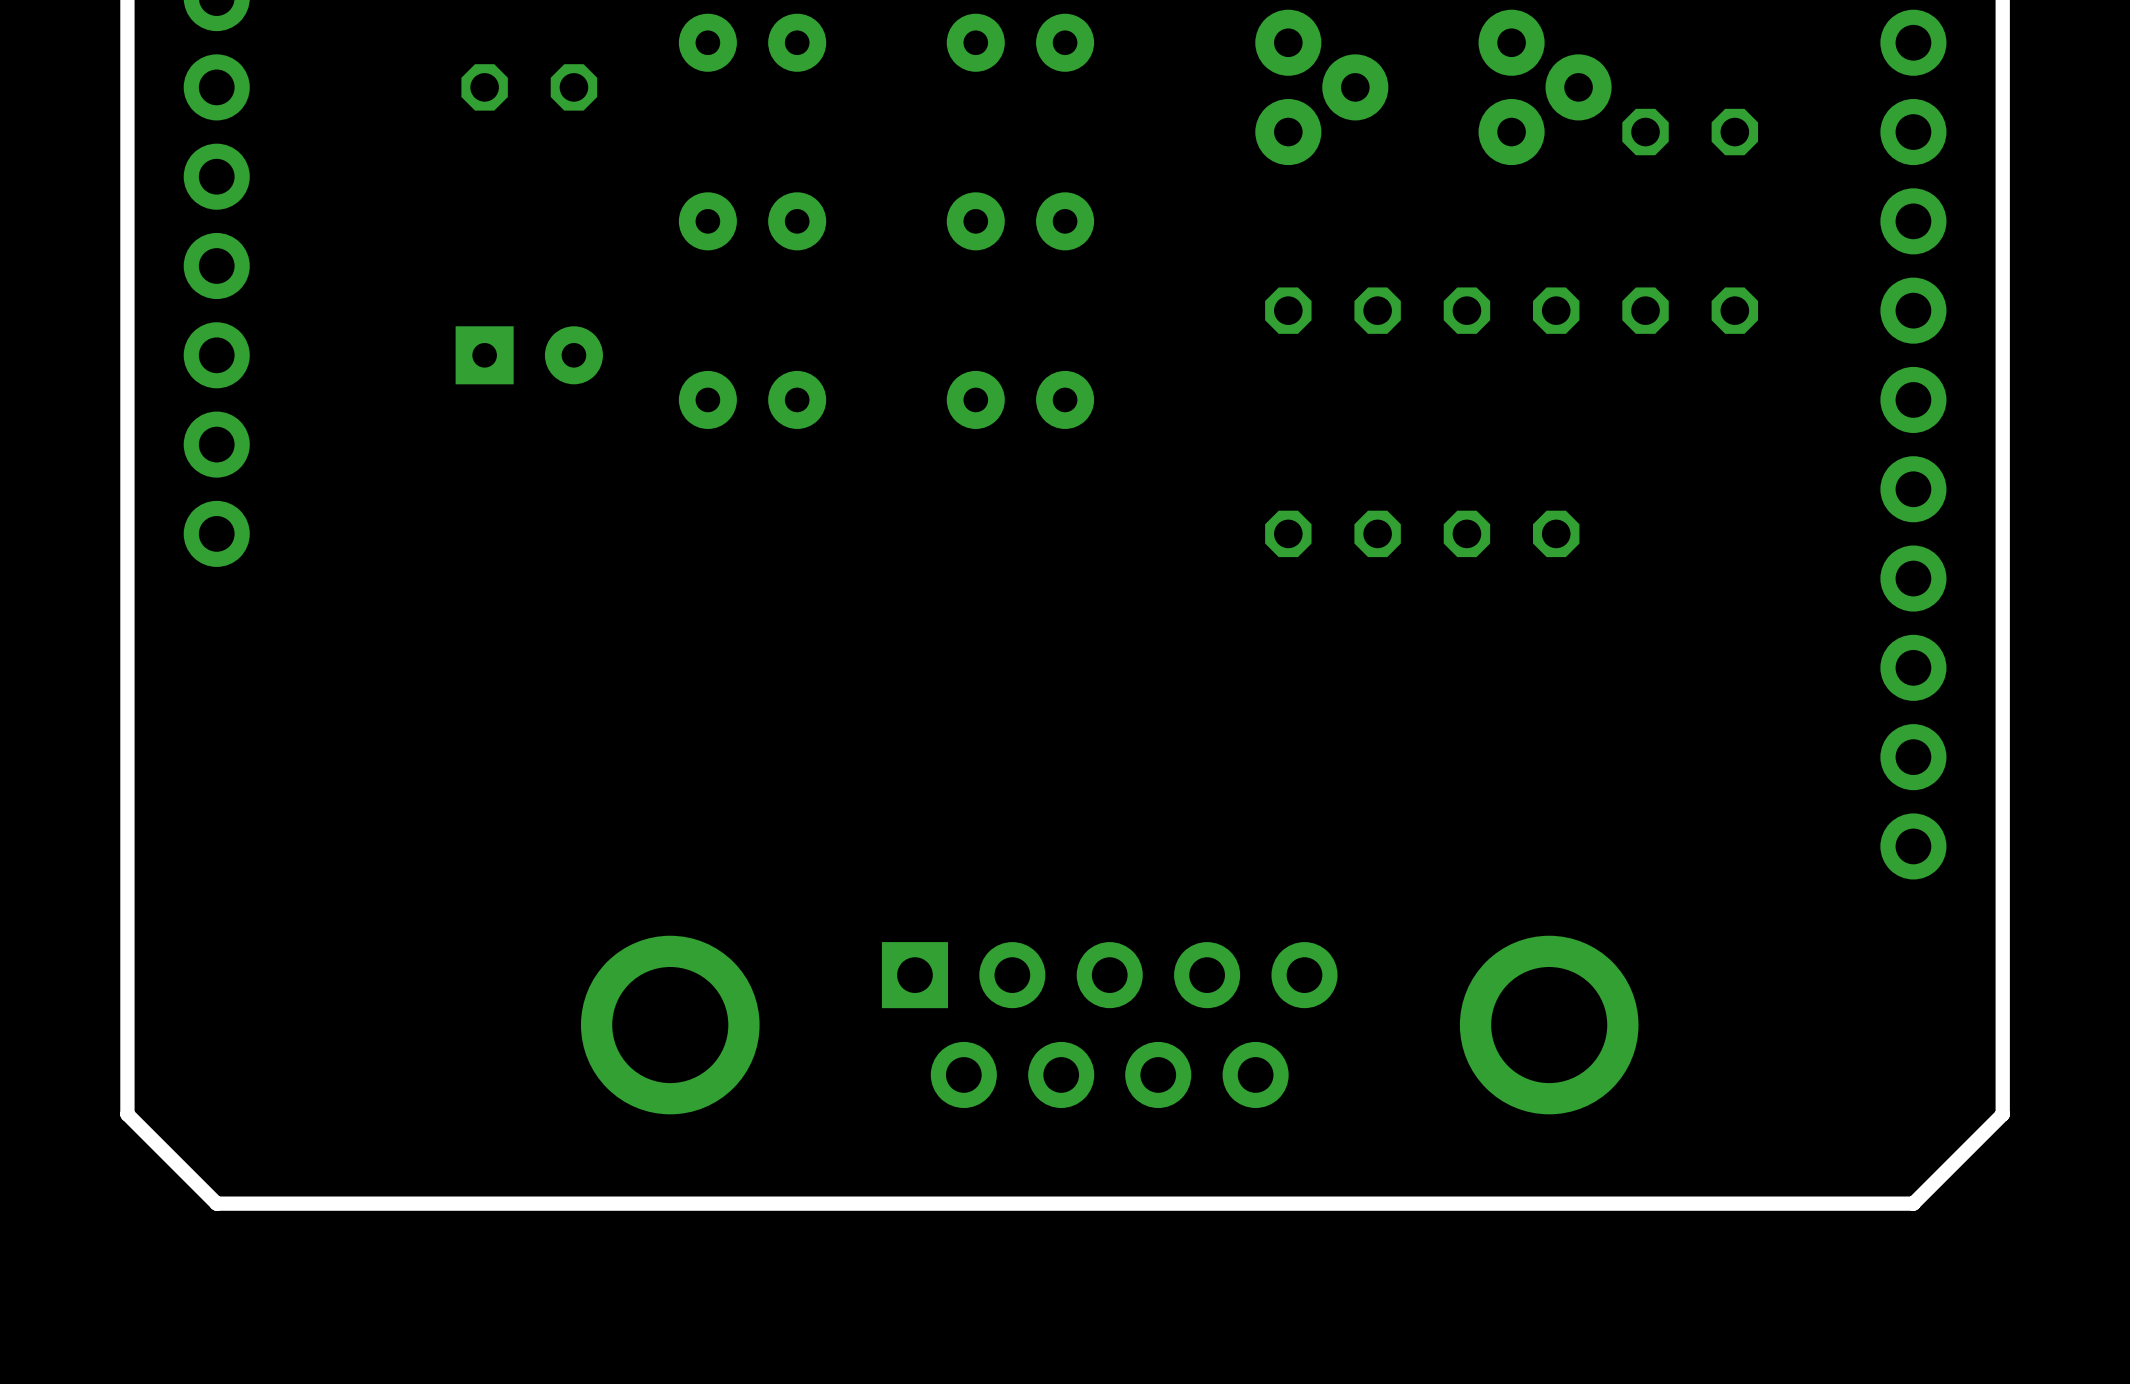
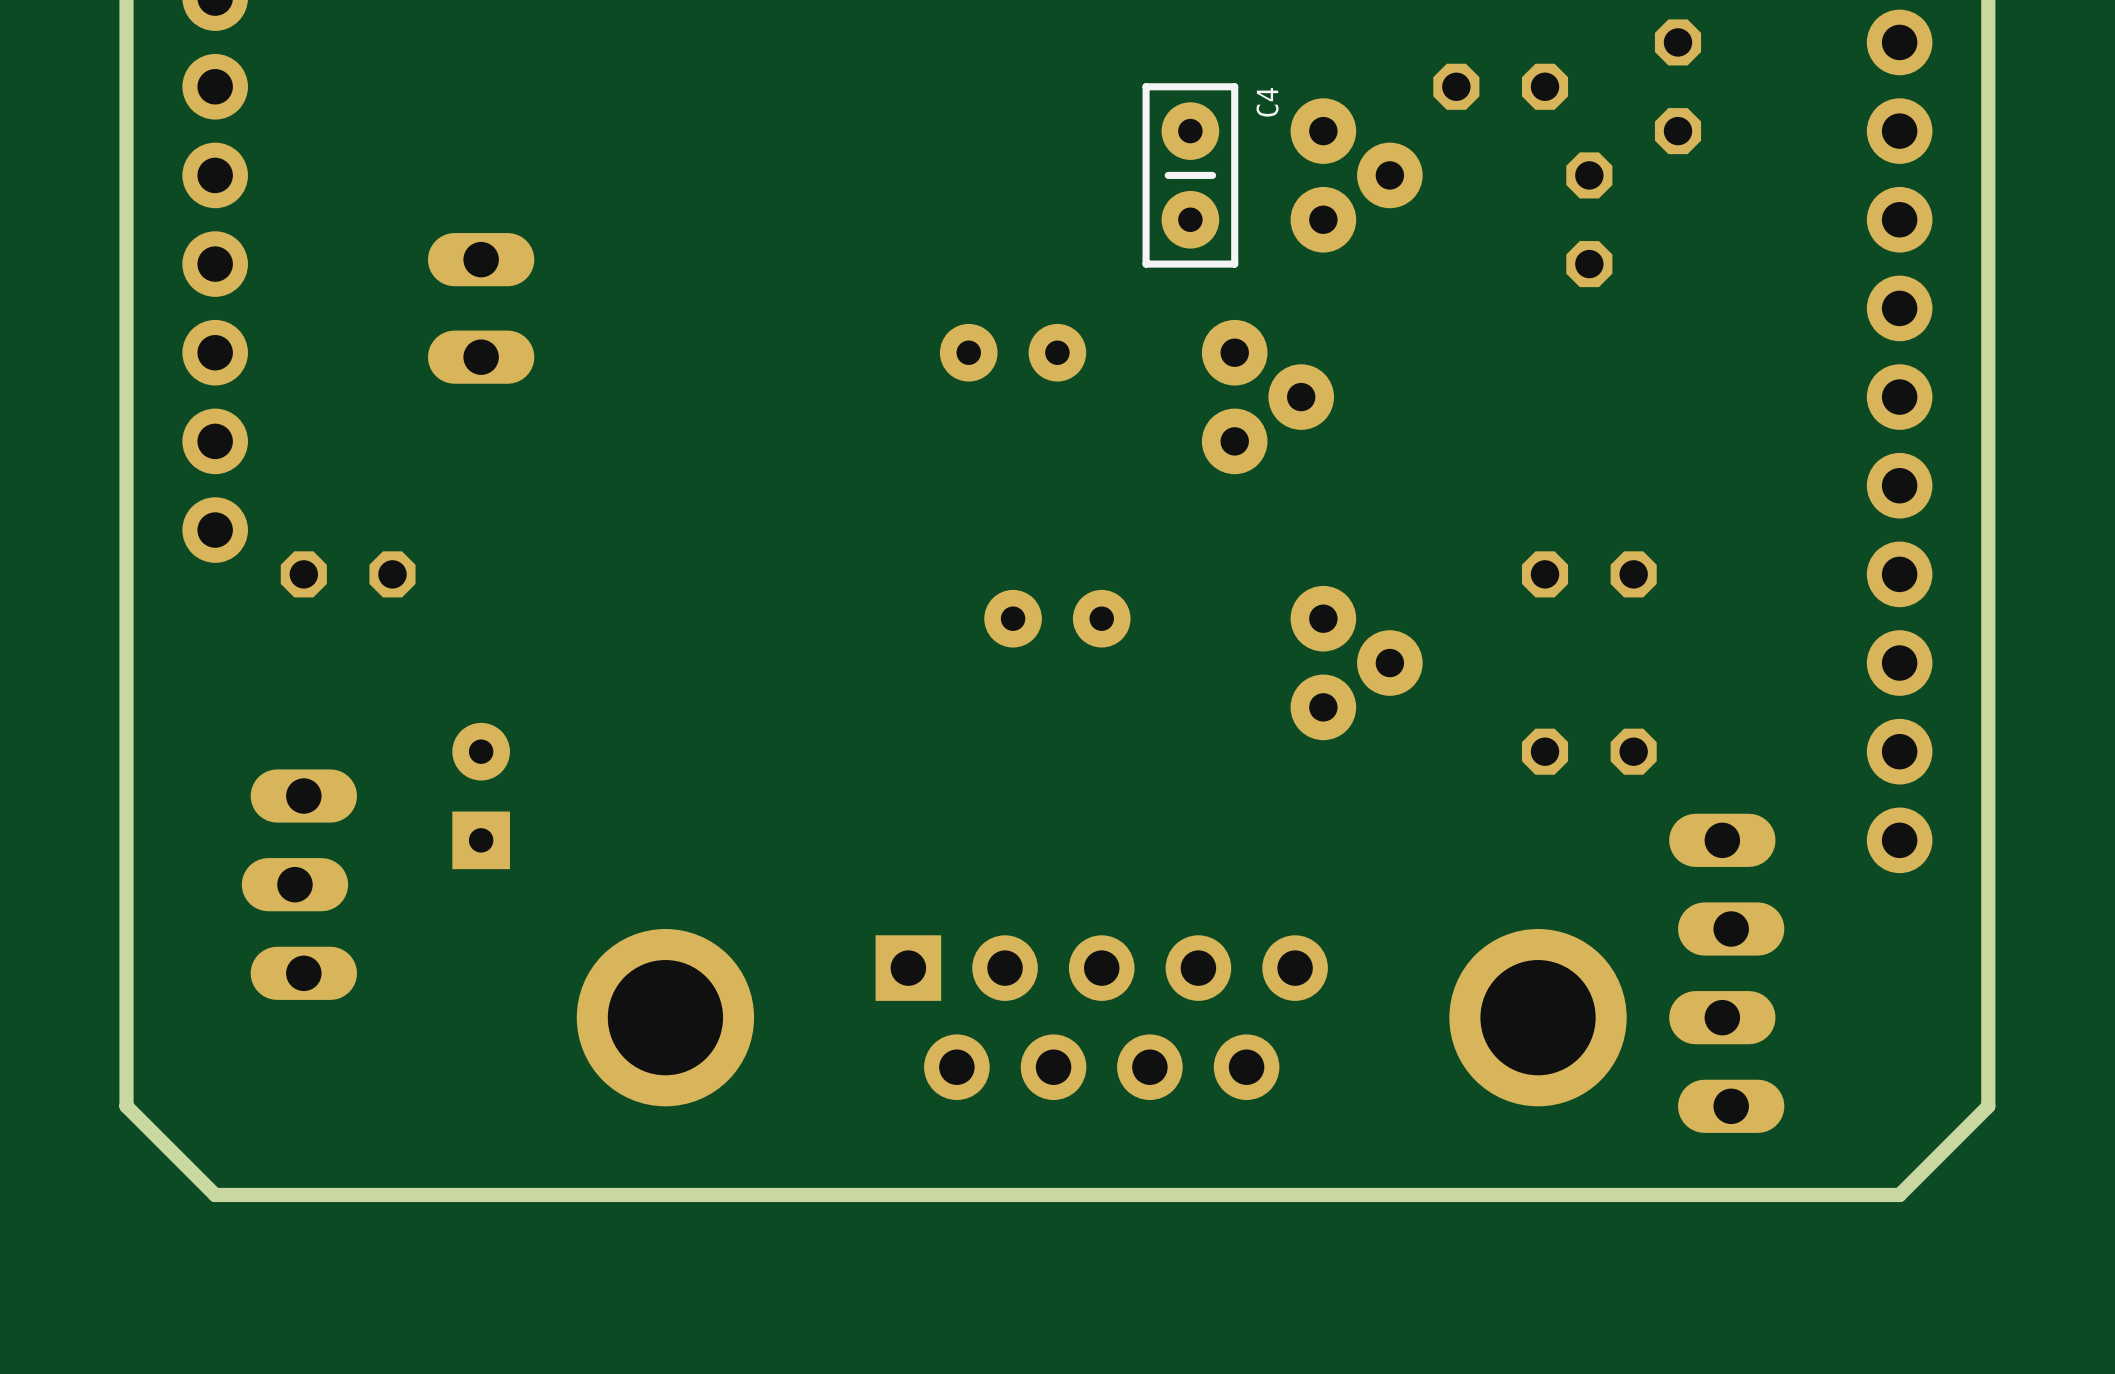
part footprint: [1478, 9, 1612, 166] -> [1433, 63, 1569, 110]
part: (752, 42) -> none
C4 side: top (1020, 42) -> bottom (1190, 175)
part: (529, 87) -> none
part position: (1321, 87) -> (1356, 175)
part rotation: 0° (1690, 132) -> 90° clockwise (1678, 86)
part: (752, 221) -> none
part: (1020, 221) -> none
part: none -> (1589, 219)
part: none -> (481, 308)
part: (1332, 310) -> none
part: (1511, 310) -> none
part: (1690, 310) -> none
part rotation: 0° (529, 355) -> 90° counterclockwise (481, 796)
part position: (529, 355) -> (481, 796)
part: (752, 399) -> none
part position: (1020, 399) -> (1013, 352)
part: none -> (1267, 397)
part: (1332, 533) -> none
part position: (1511, 533) -> (1589, 574)
part: none -> (348, 574)
part: none -> (1057, 618)
part: none -> (1356, 663)
part: none -> (1589, 751)
part: none -> (299, 884)
part: none -> (1726, 973)

